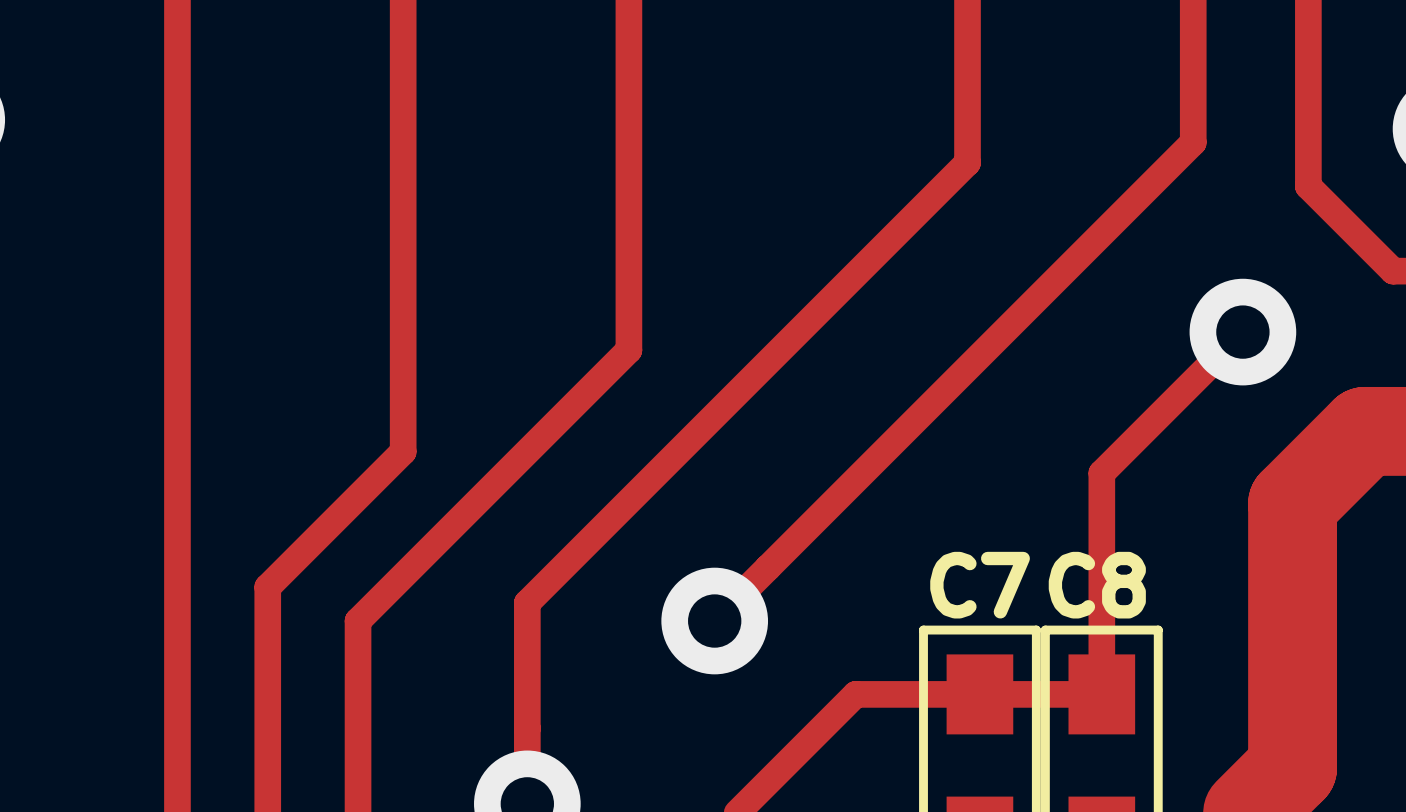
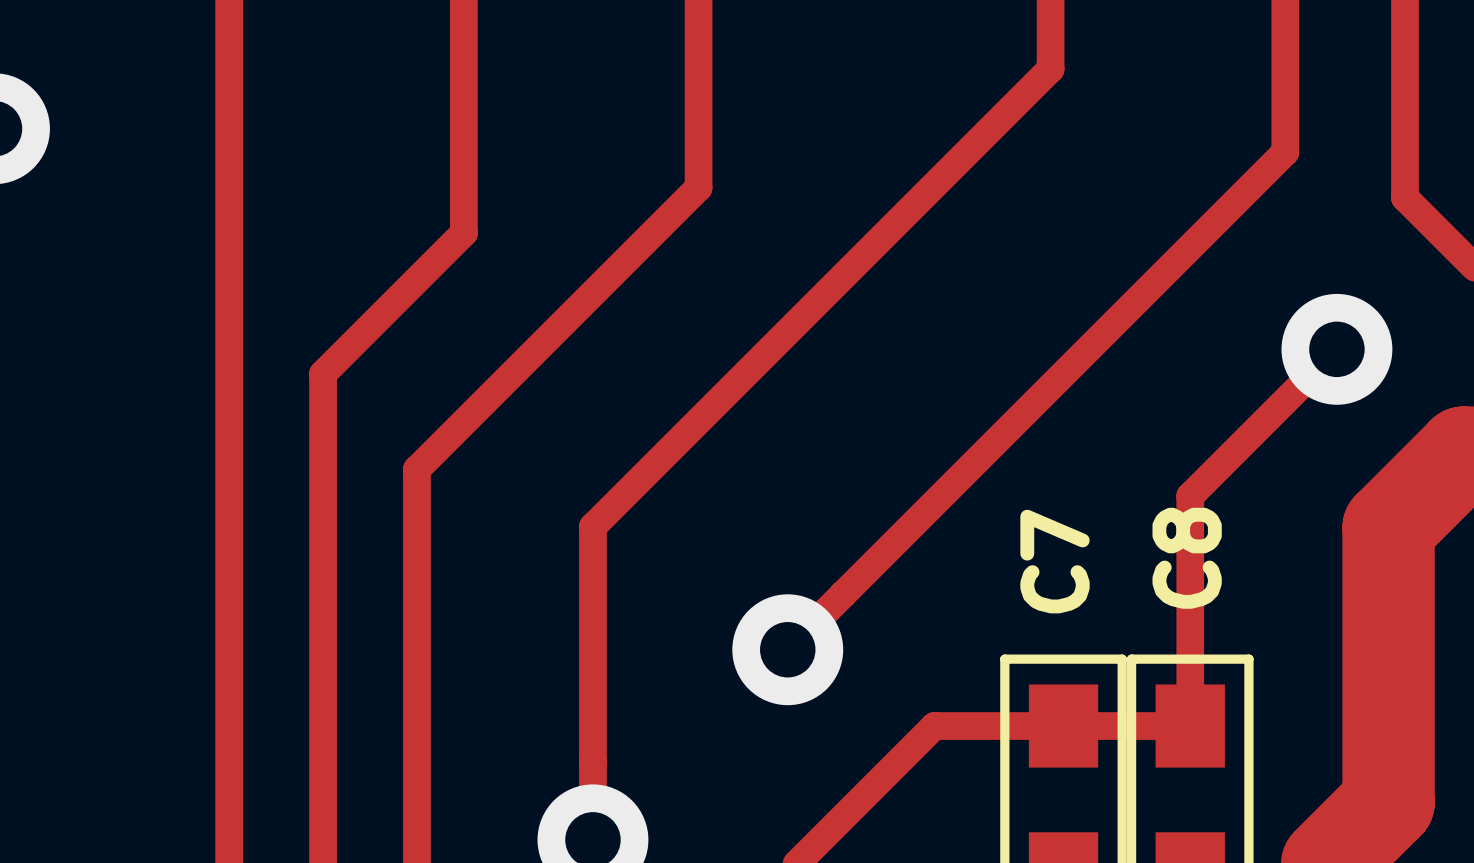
track: (967, 62) (967, 162) (527, 602) -> (1050, 69) (592, 526) (592, 630)
track: (628, 176) (628, 350) (358, 621) -> (698, 187) (416, 469) (416, 649)
track: (403, 220) (403, 451) (267, 587) -> (463, 233) (323, 373) (323, 614)
C7 name rotation: 0° (980, 585) -> 90° counterclockwise (1055, 561)
C8 name rotation: 0° (1097, 585) -> 90° counterclockwise (1187, 558)

